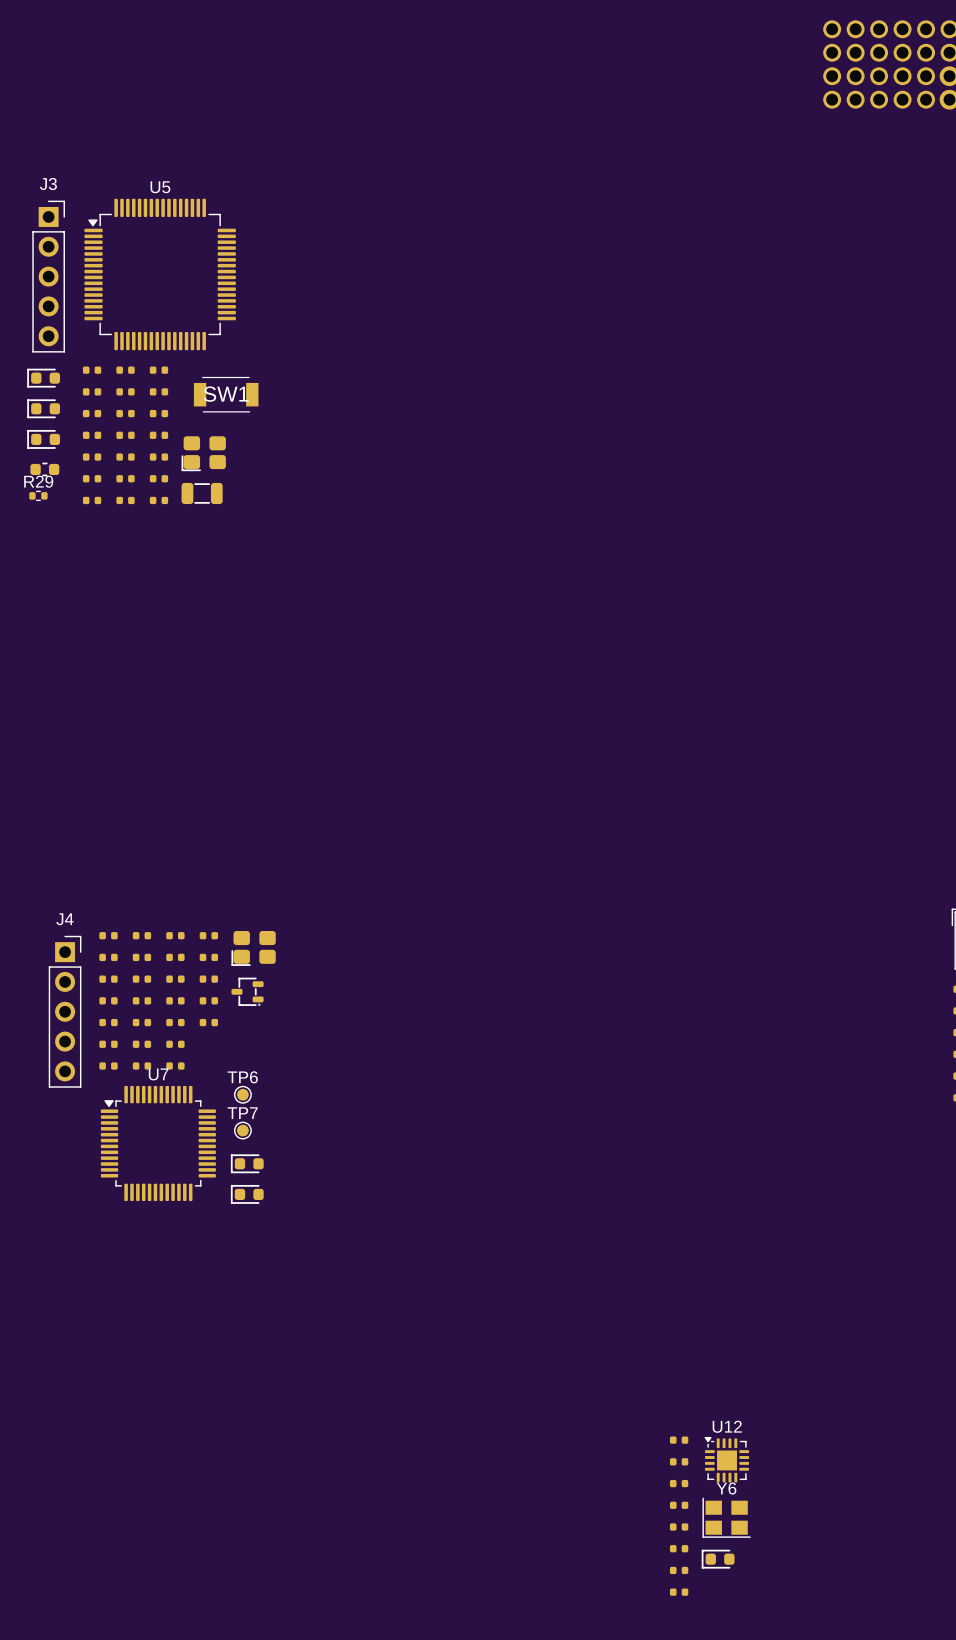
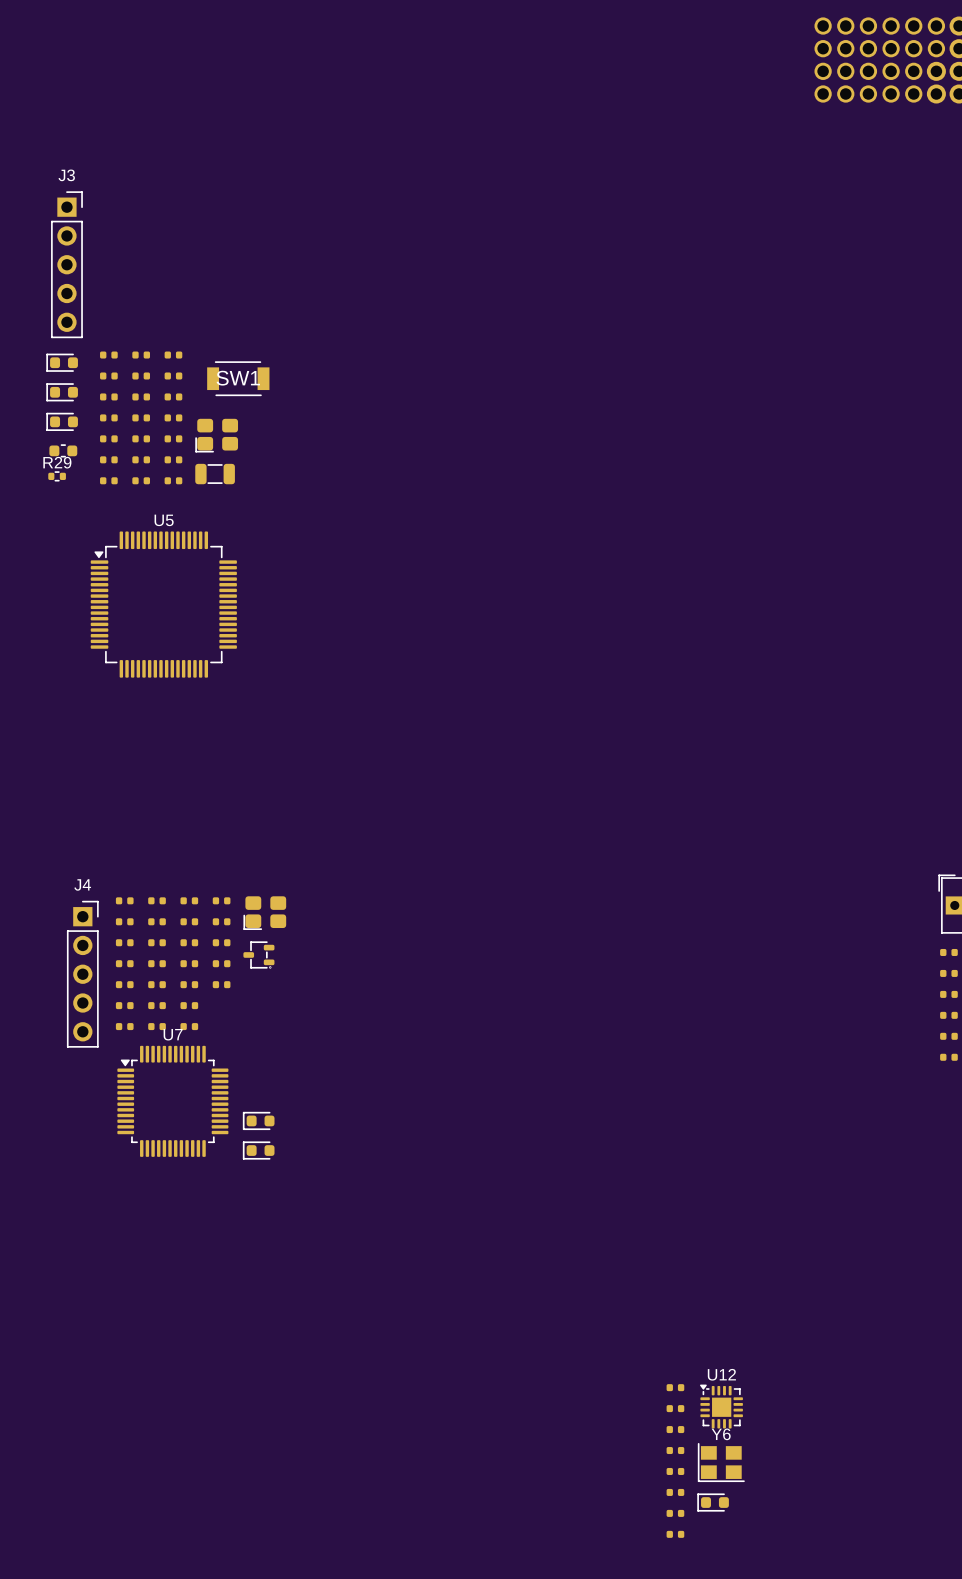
U5 position: (160, 274) -> (163, 604)
TP6: (242, 1094) -> none
TP7: (242, 1130) -> none

